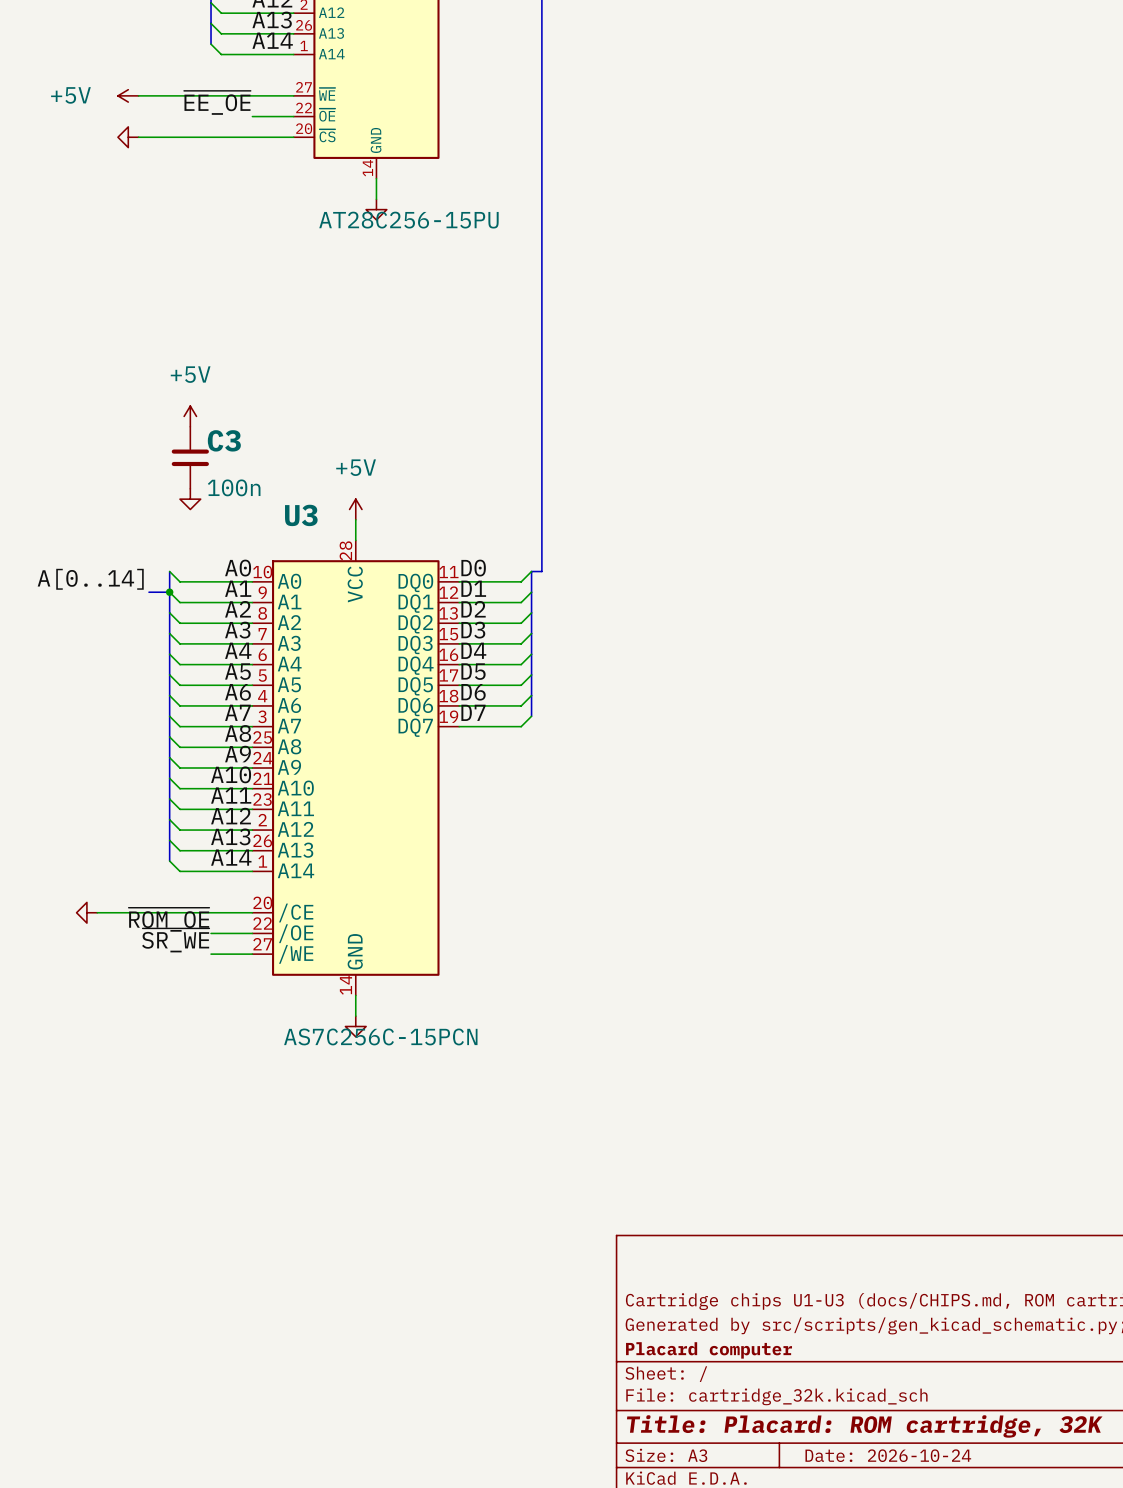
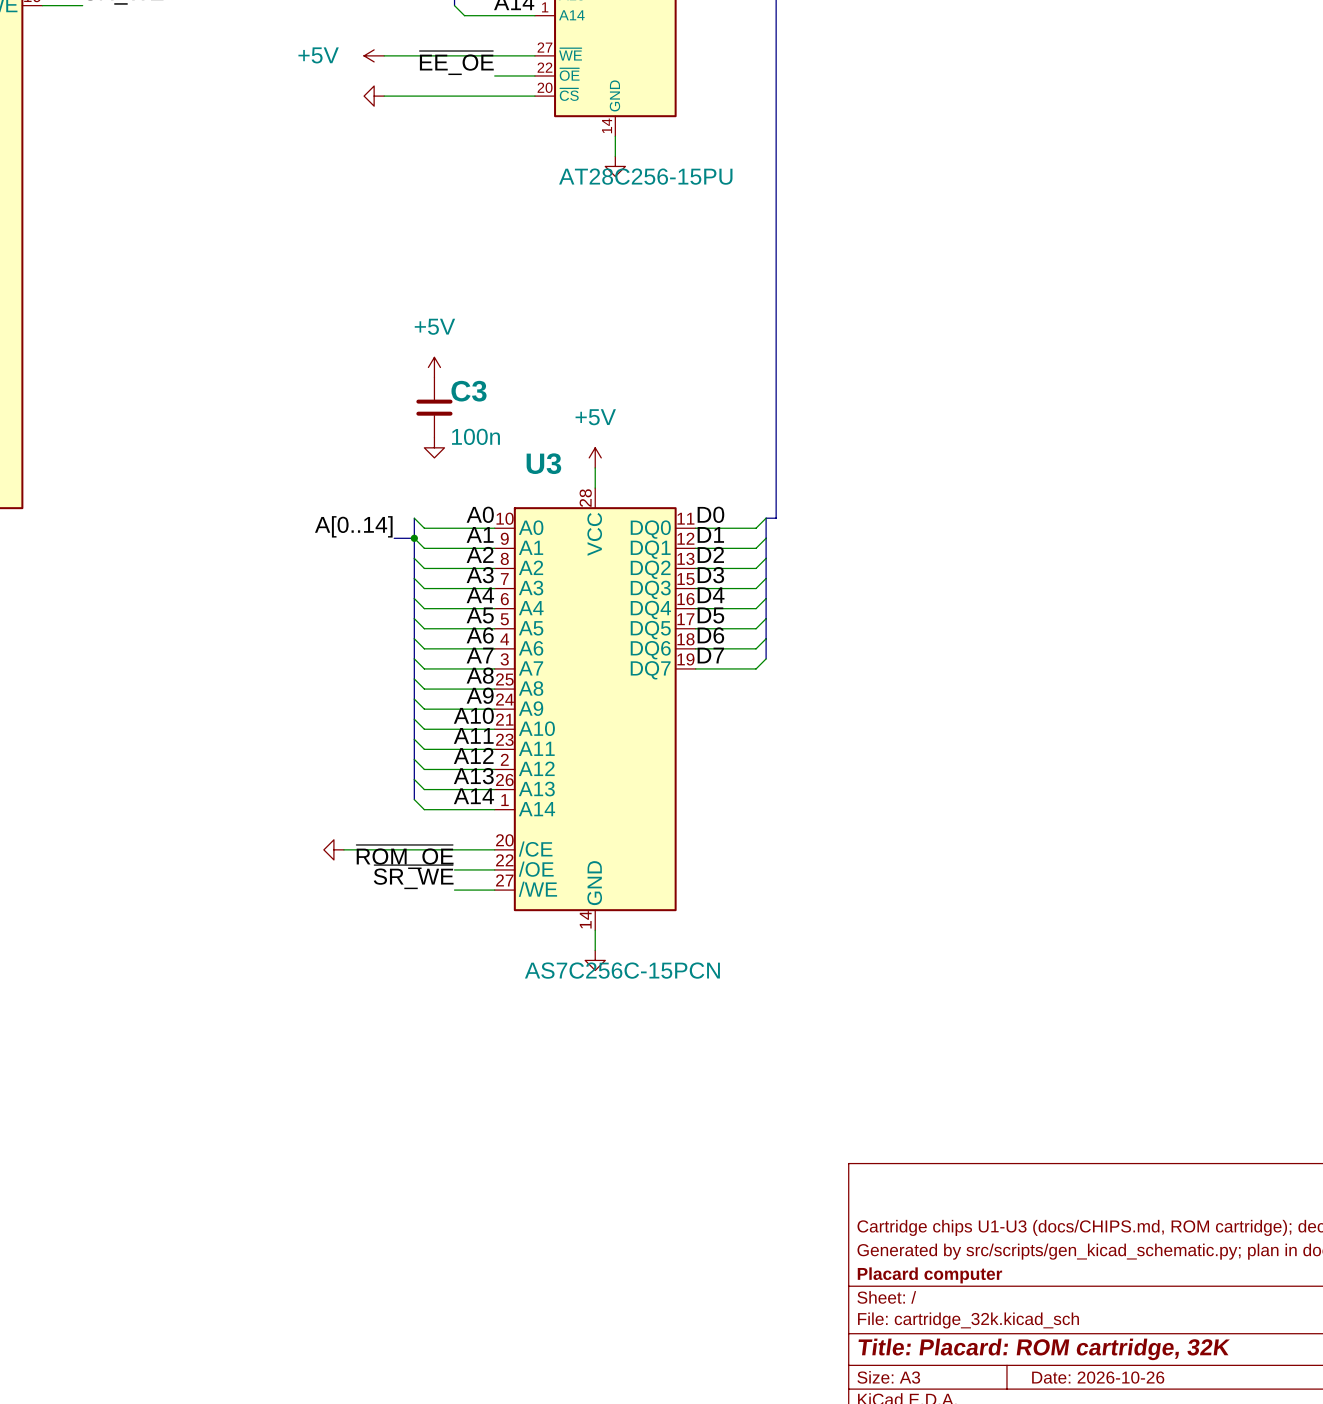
title block: Date: 2026-10-24 (888, 1455) -> Date: 2026-10-26 (1098, 1377)

